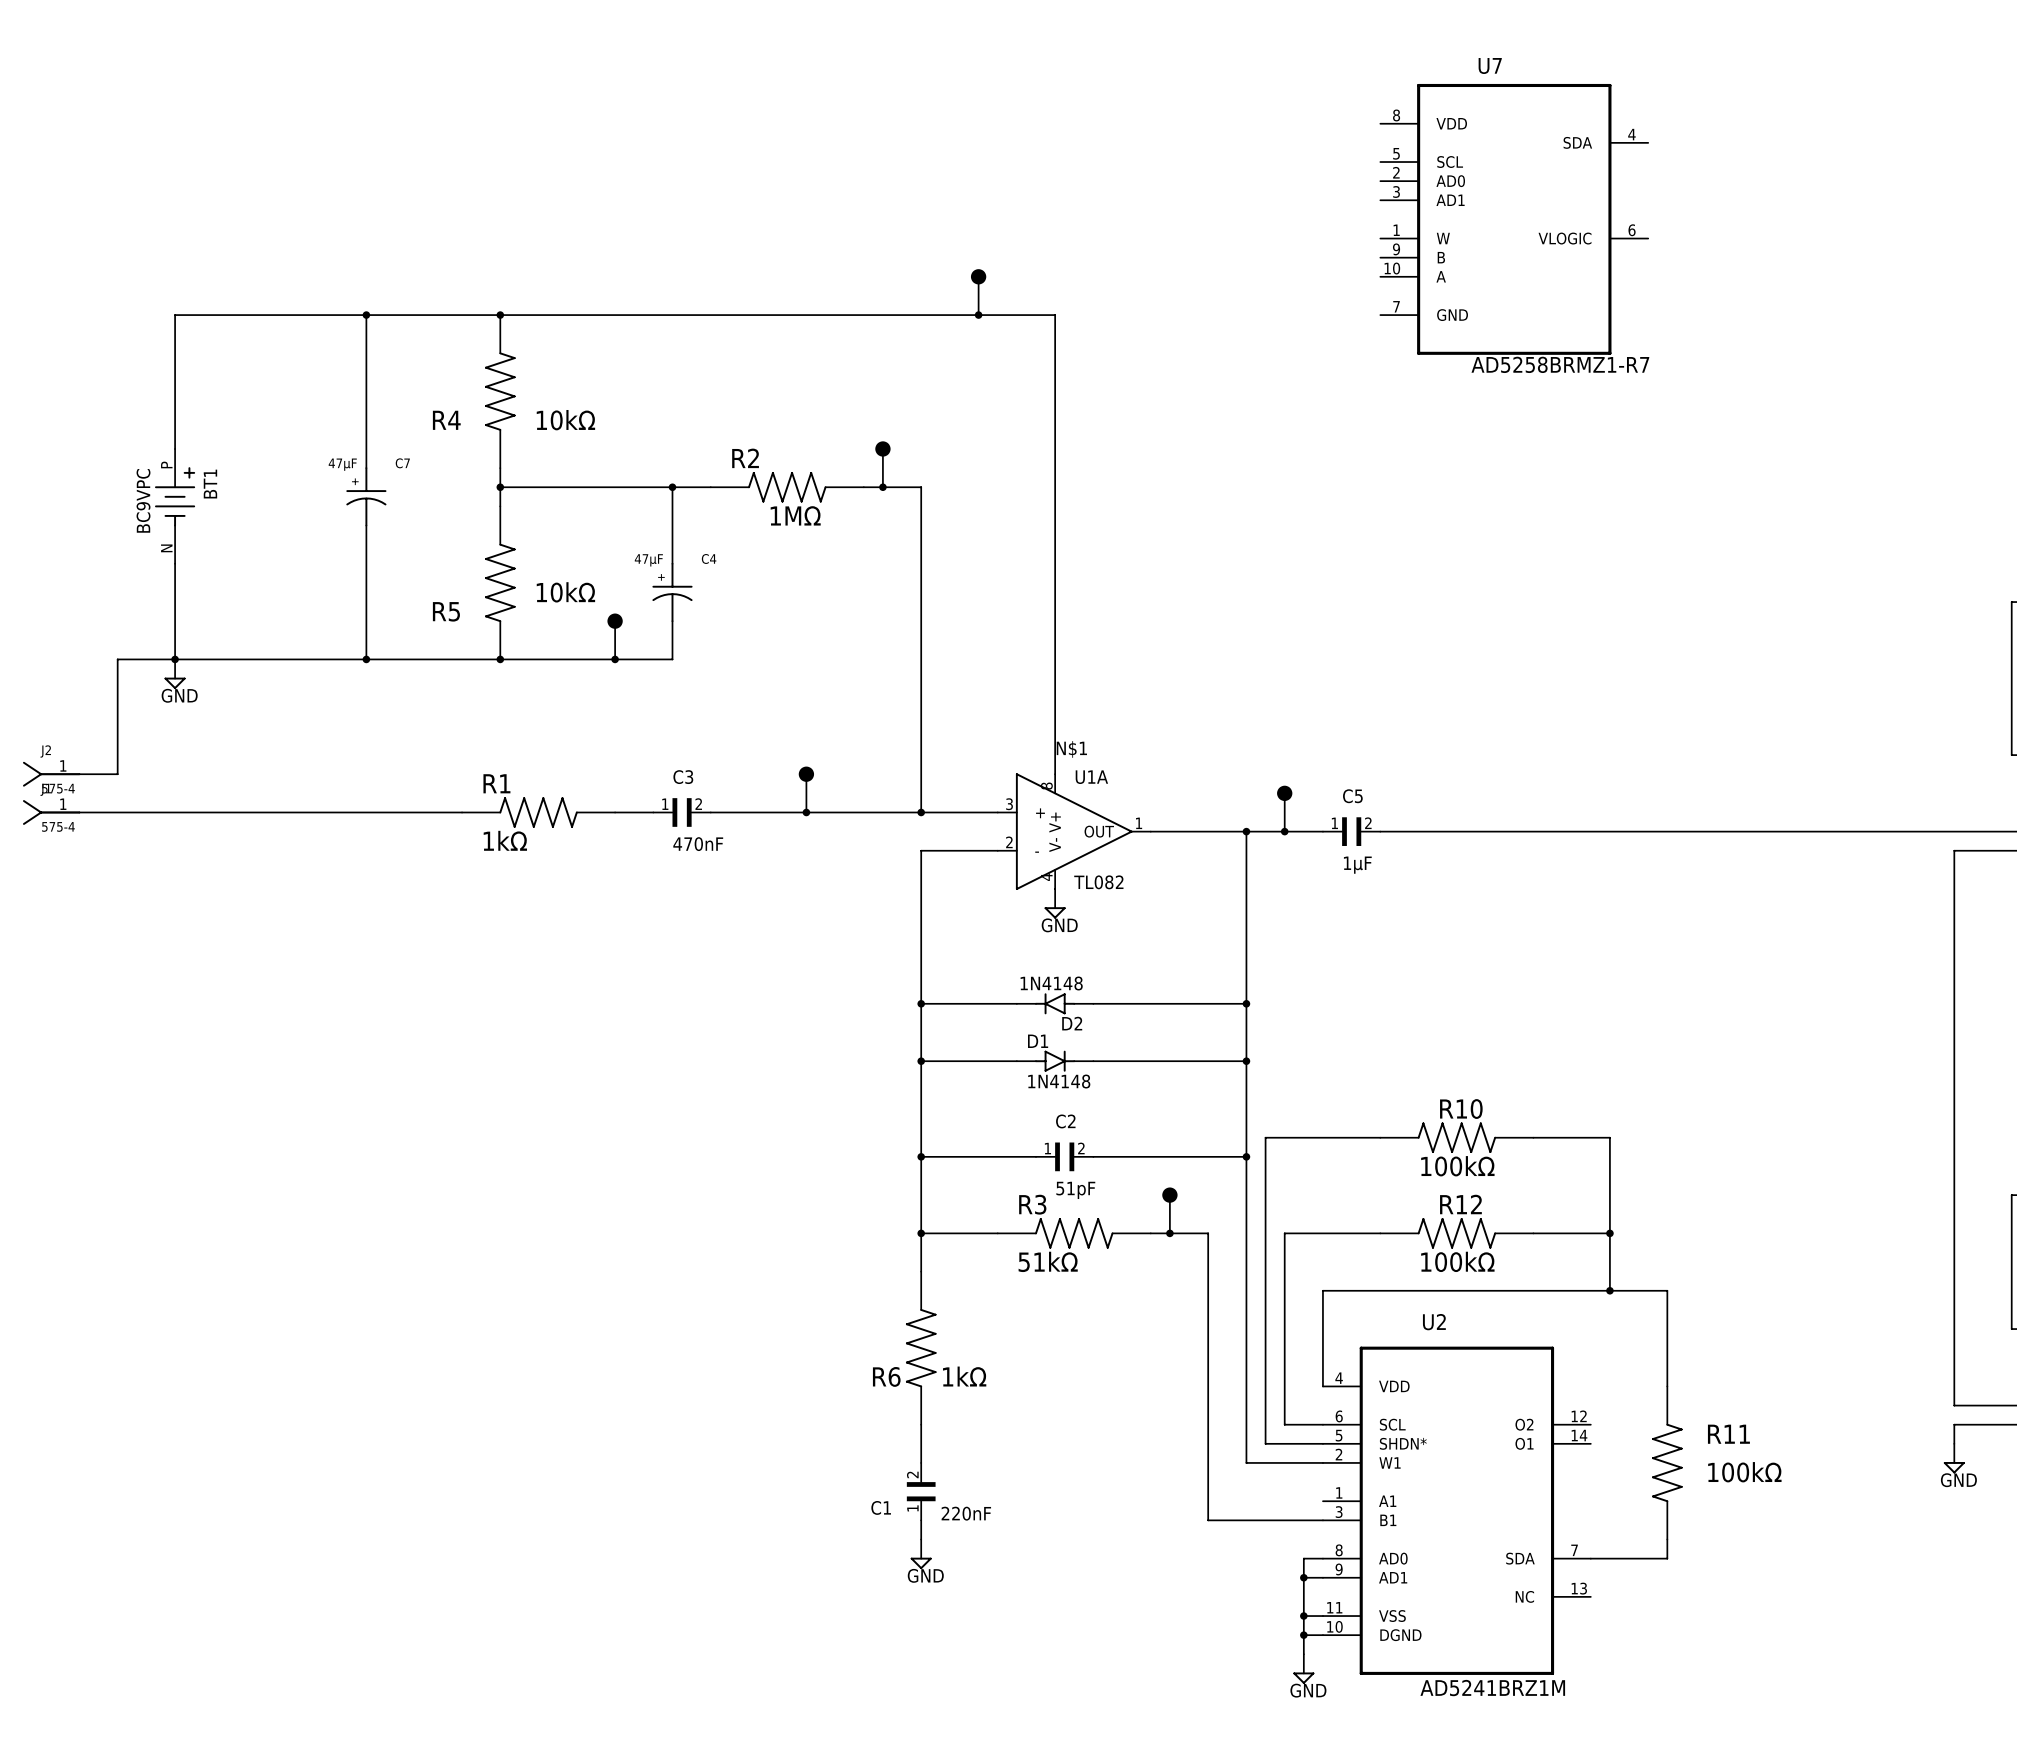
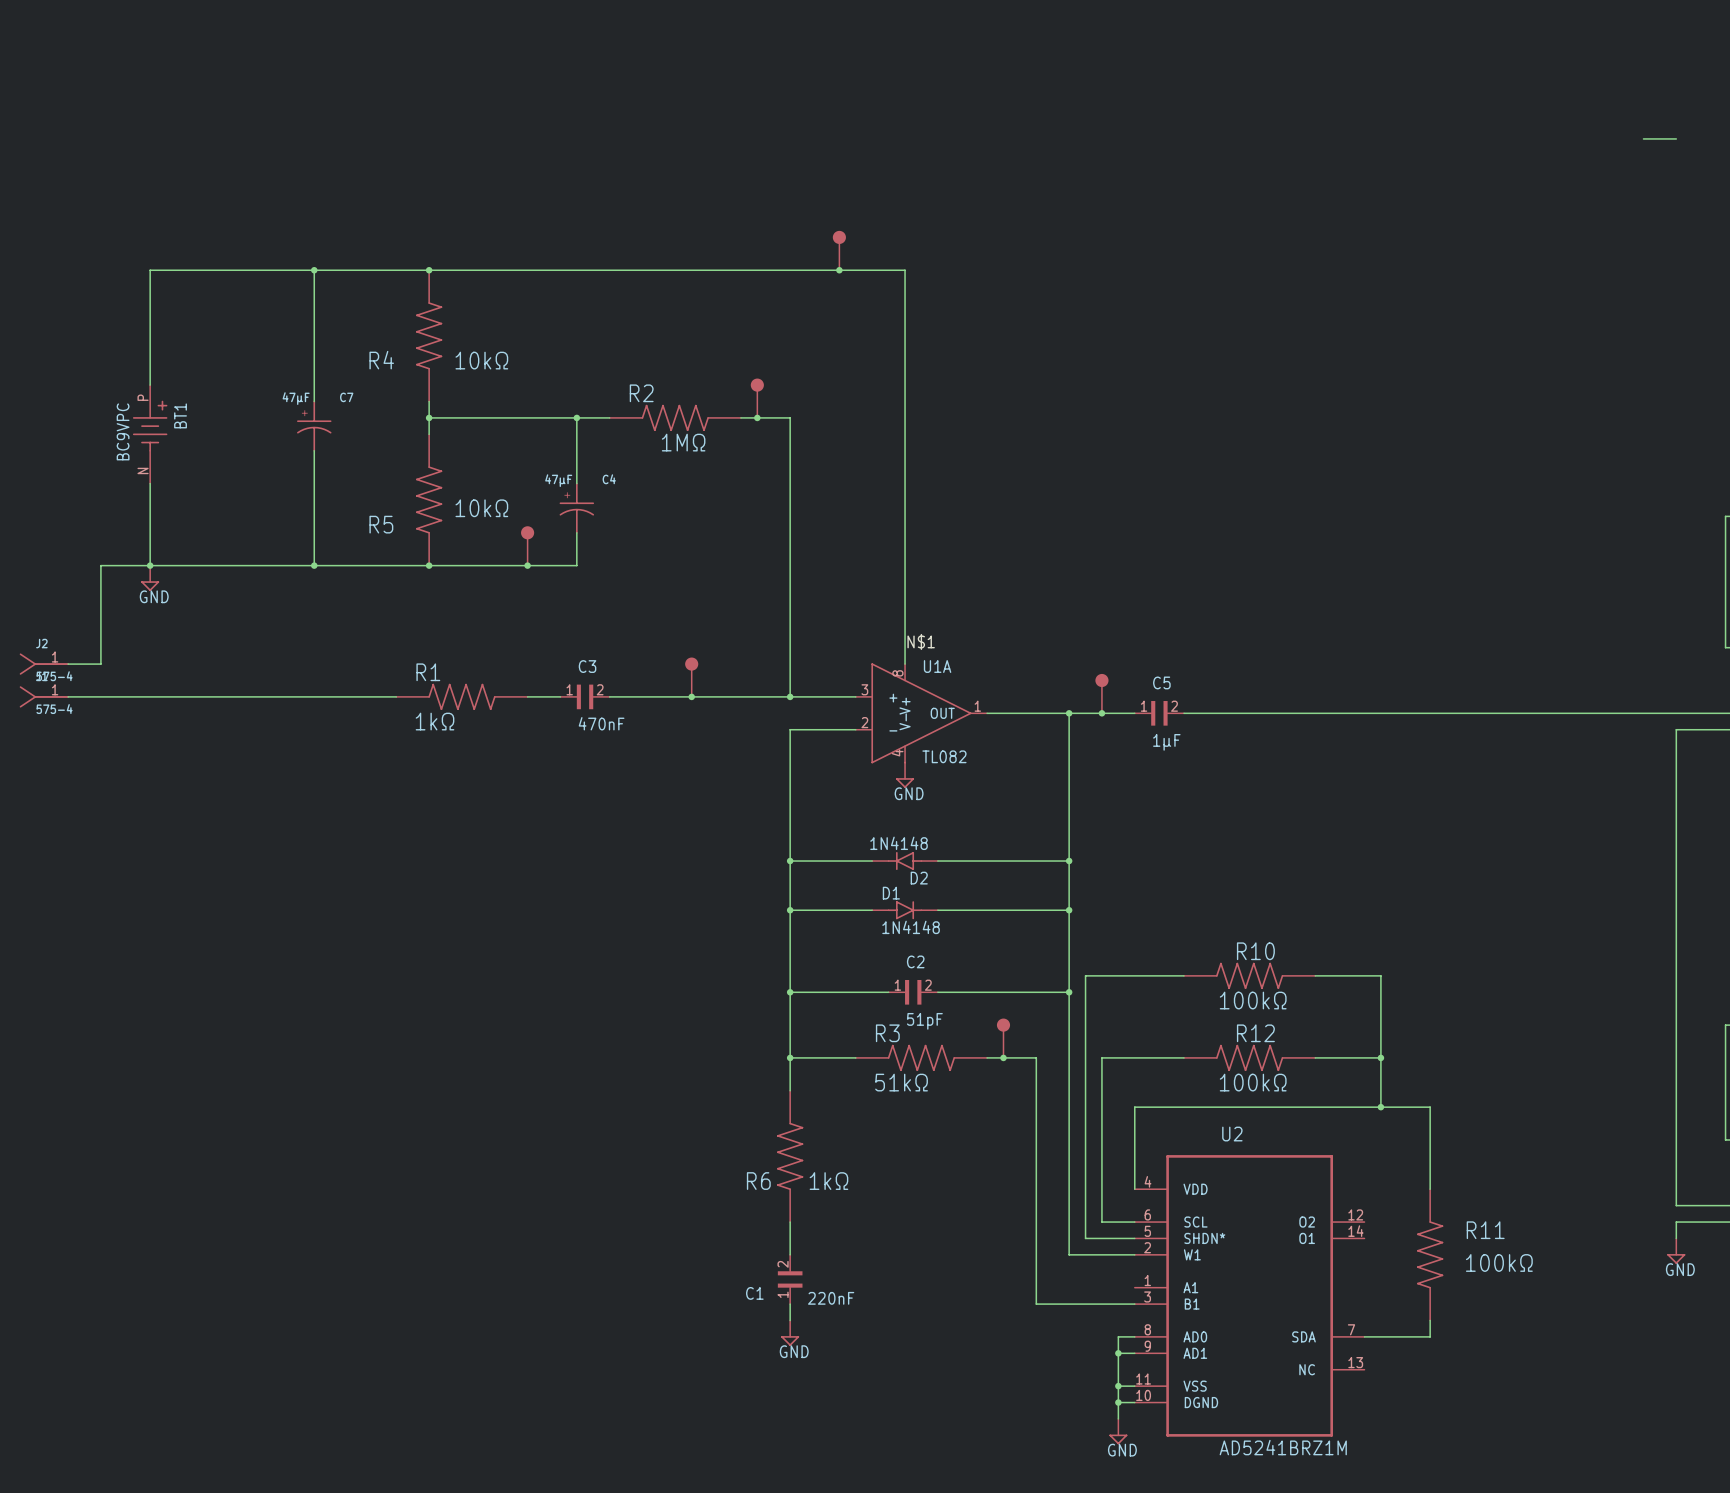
wire: none -> (1643, 138) (1676, 138)
U7: AD5258BRMZ1-R7 (1514, 219) -> none

